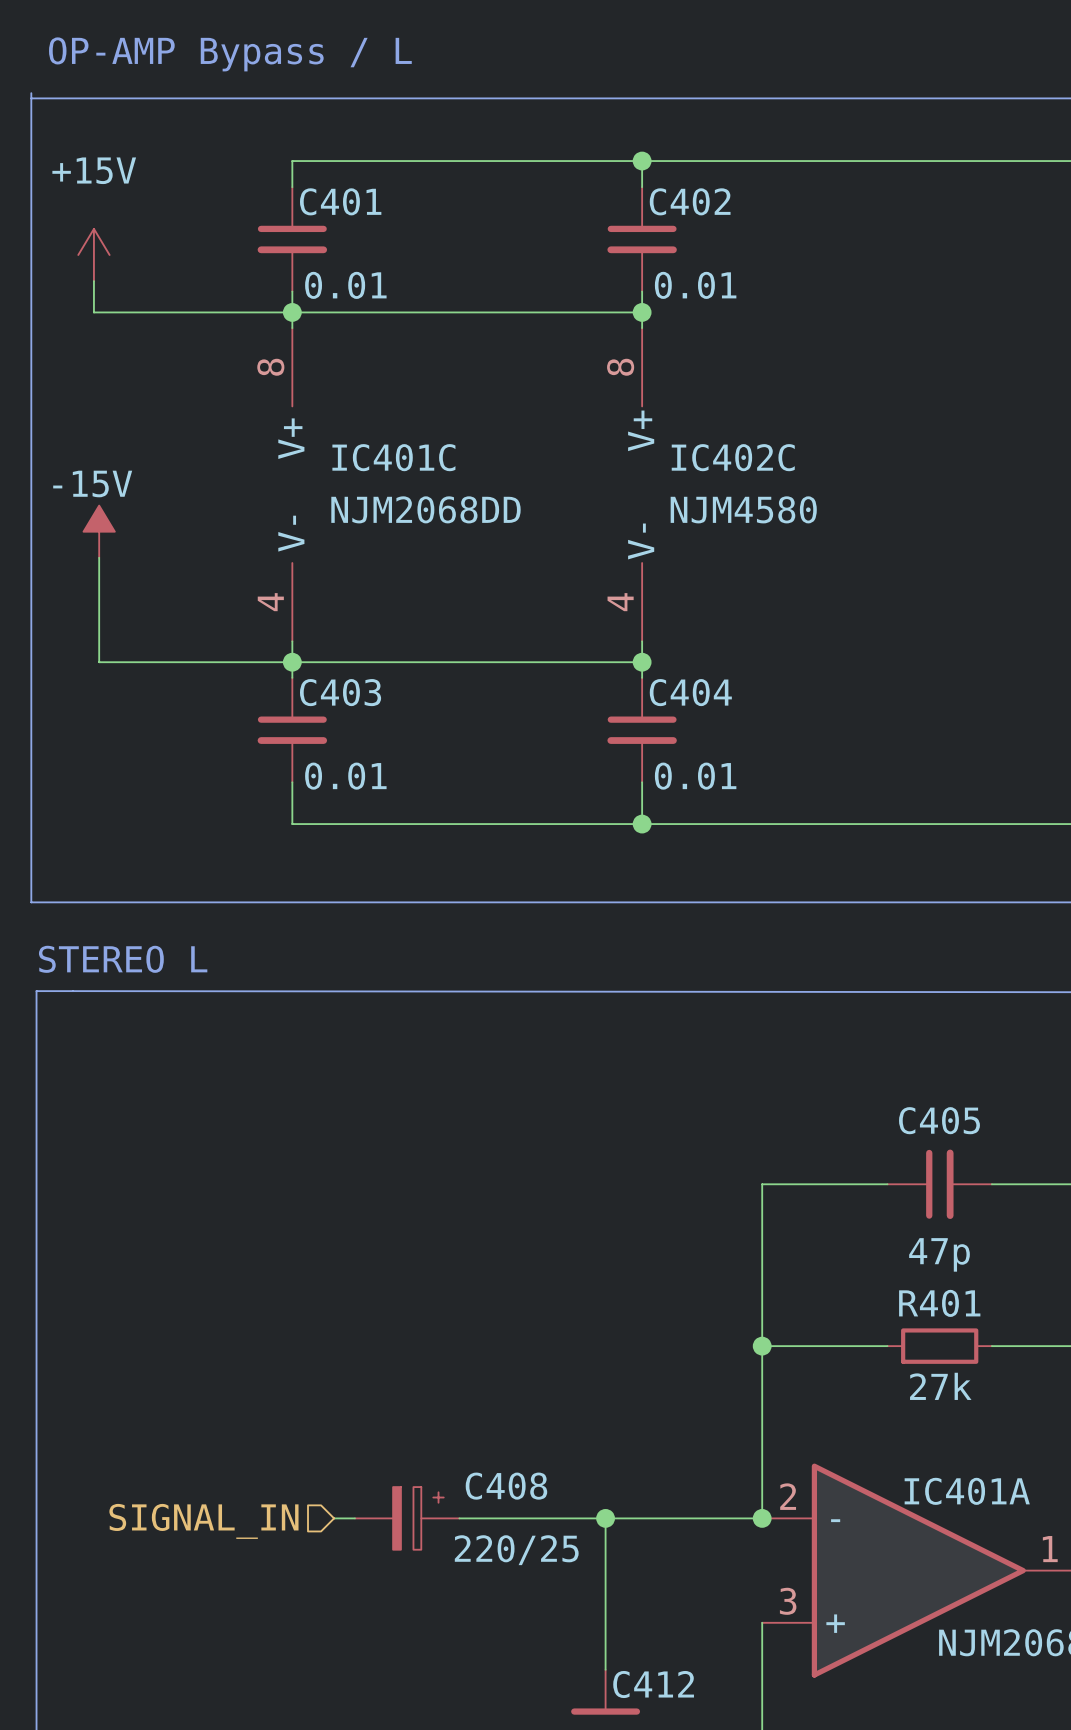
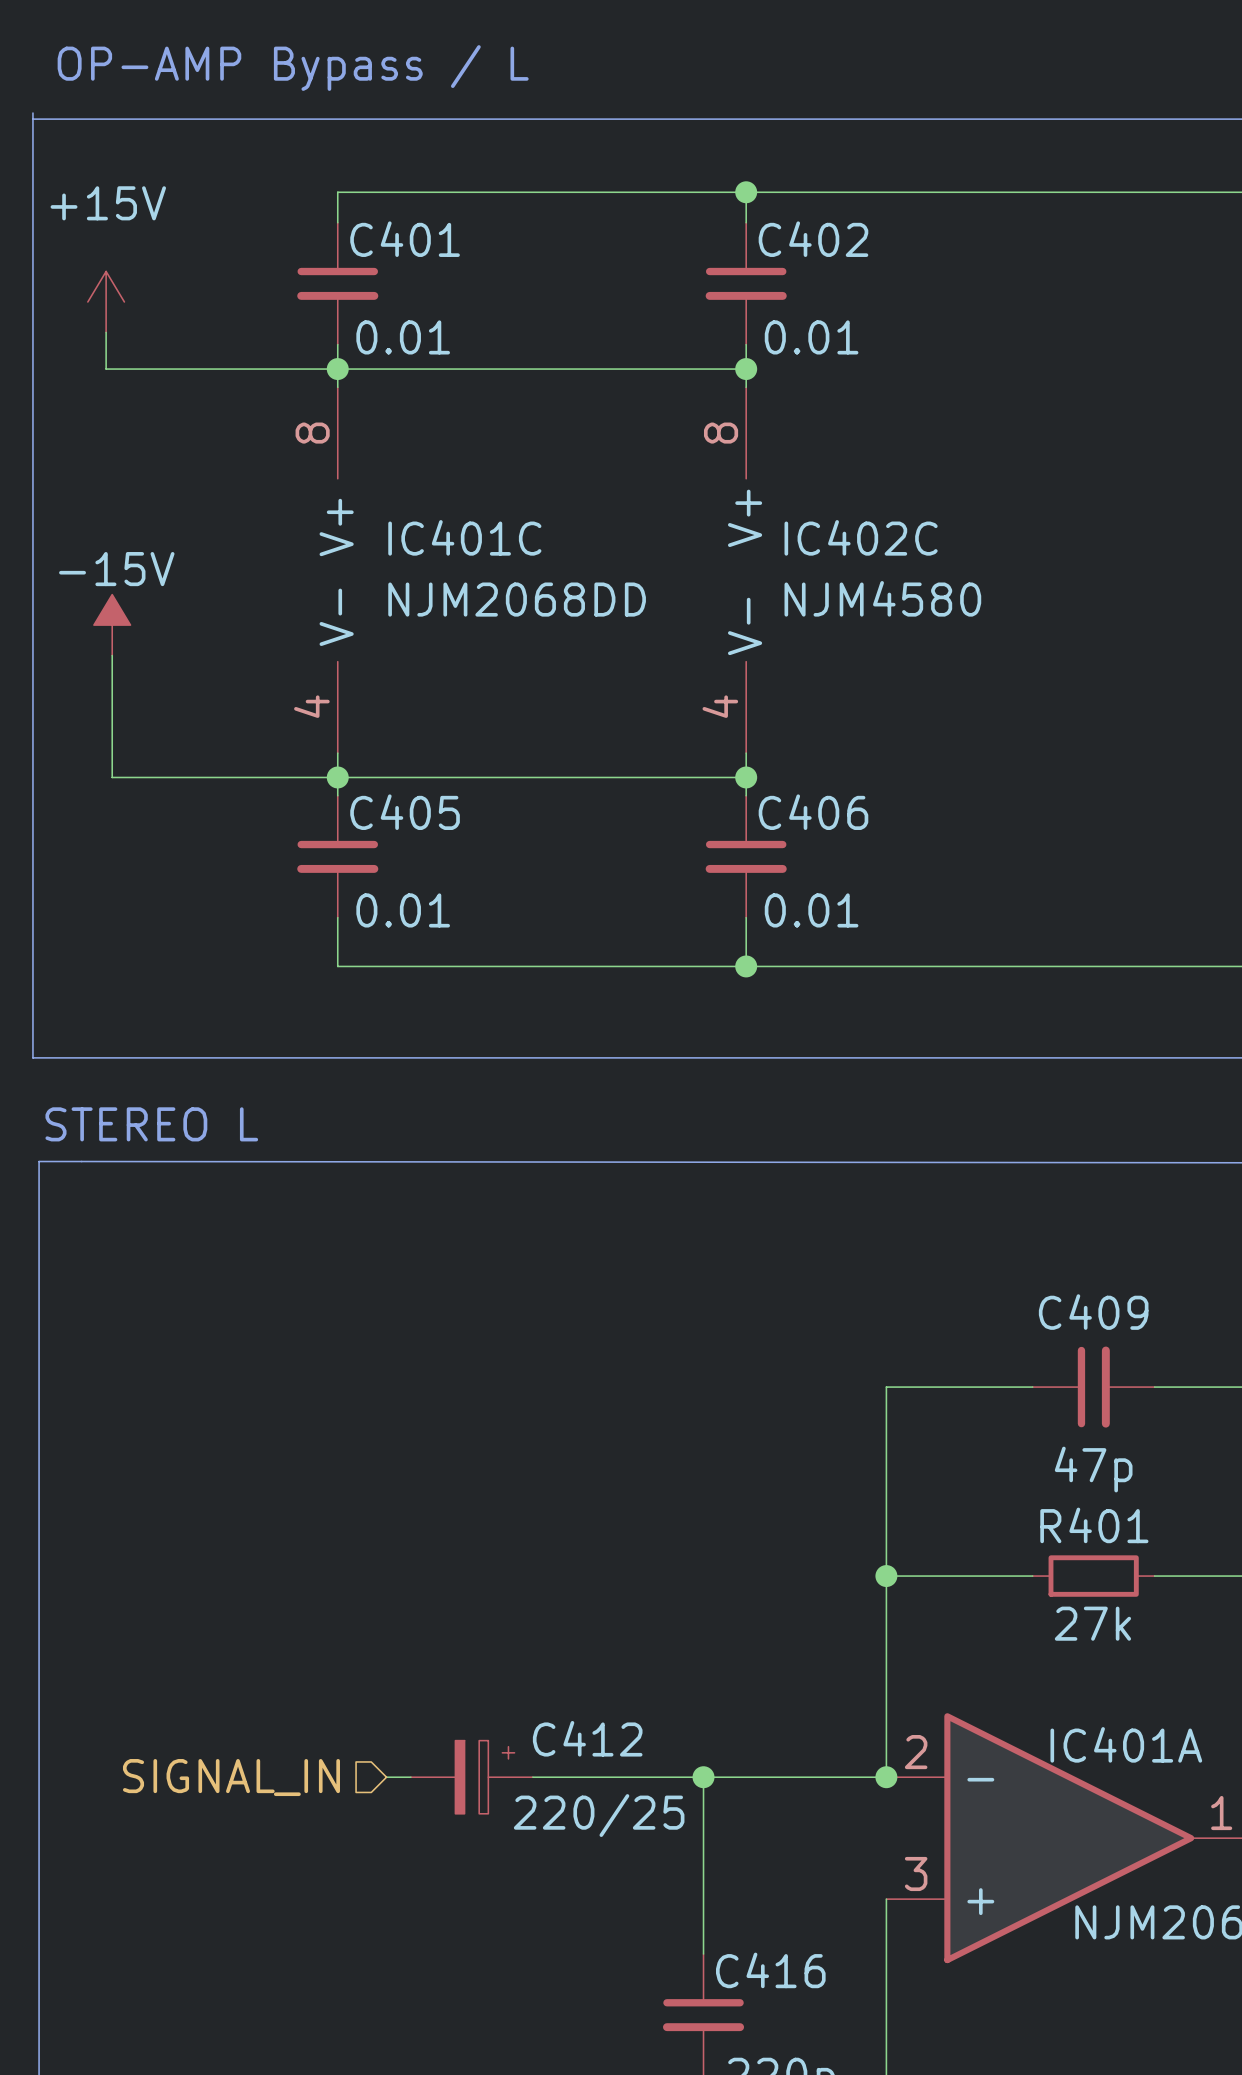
C403 name: C403 (340, 692) -> C405 (405, 812)
C404 name: C404 (690, 692) -> C406 (813, 812)
C405 name: C405 (939, 1120) -> C409 (1093, 1312)
C408 name: C408 (506, 1486) -> C412 (587, 1738)
C412 name: C412 (653, 1684) -> C416 (770, 1970)

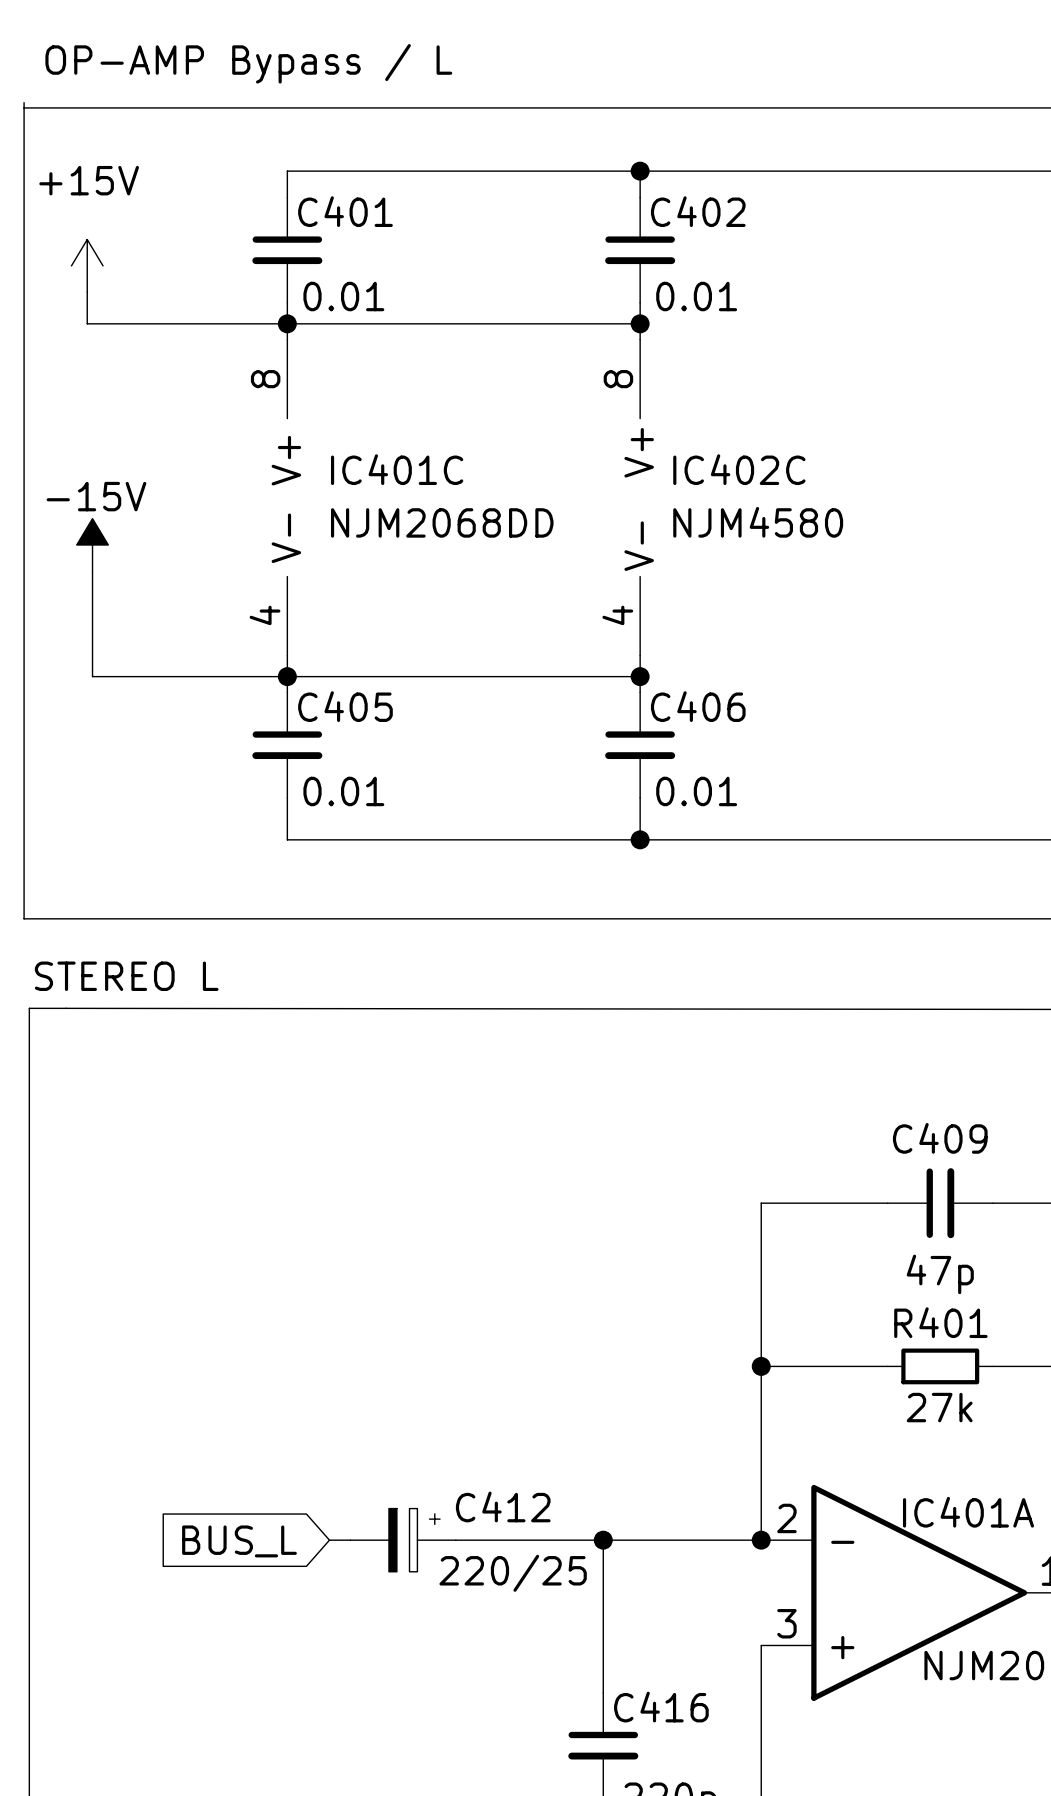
hierarchical label: SIGNAL_IN (231, 1777) -> none
global label: none -> BUS_L (239, 1541)

